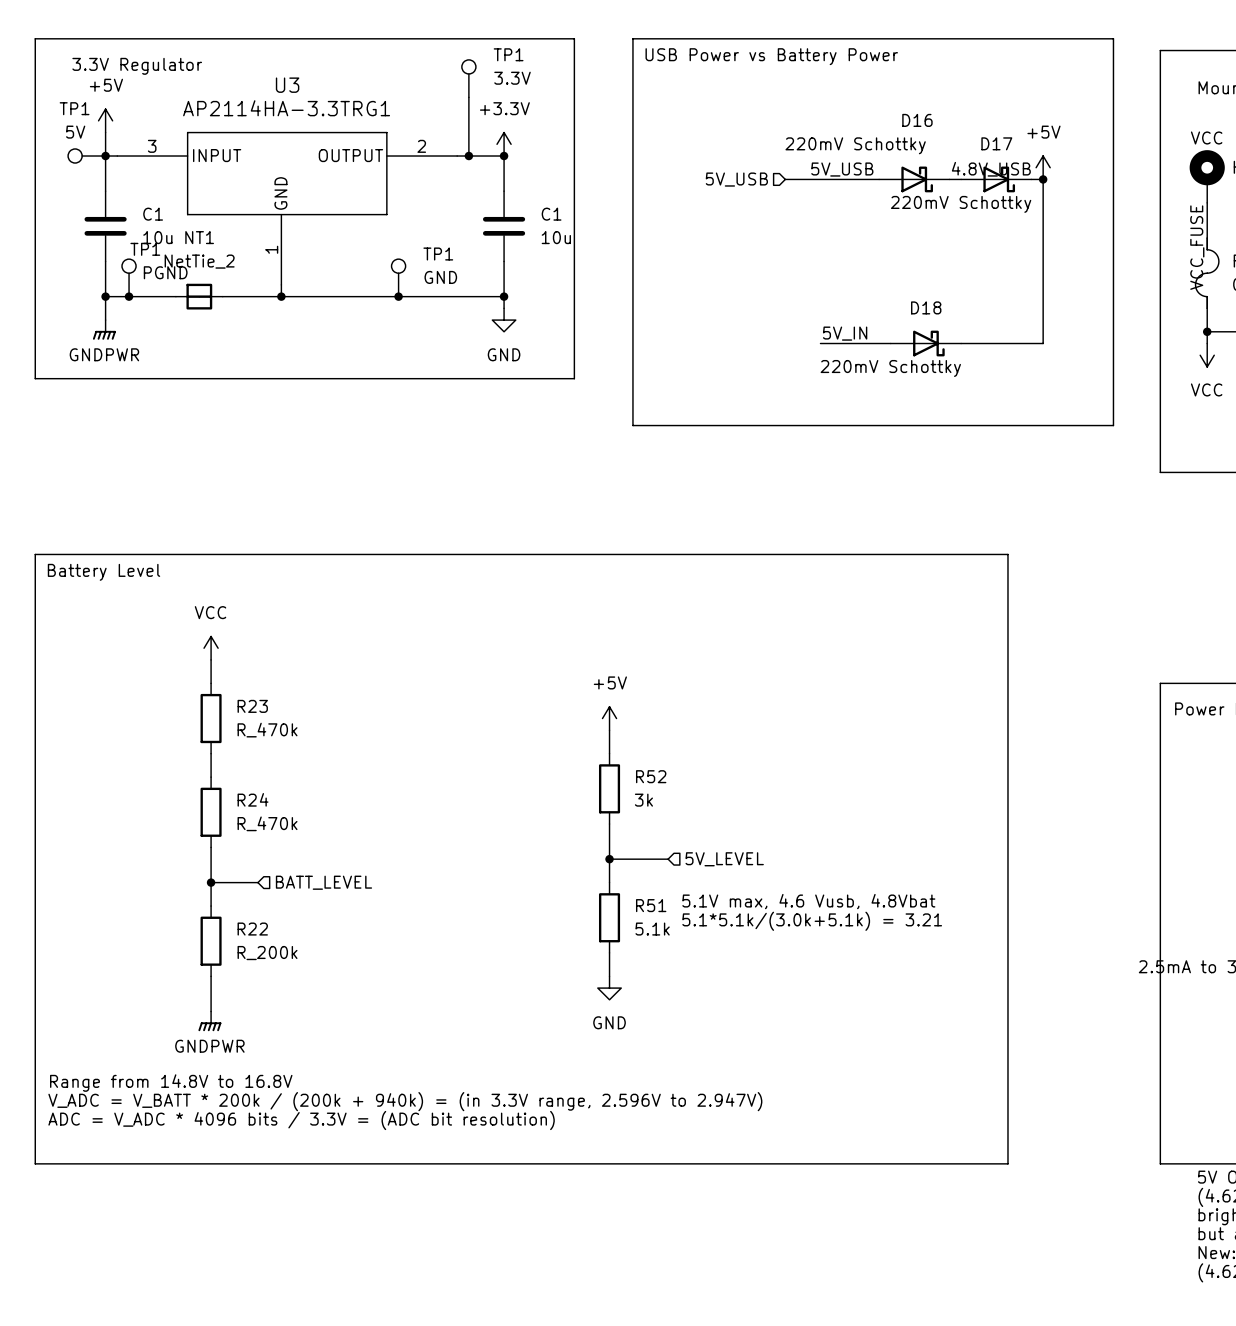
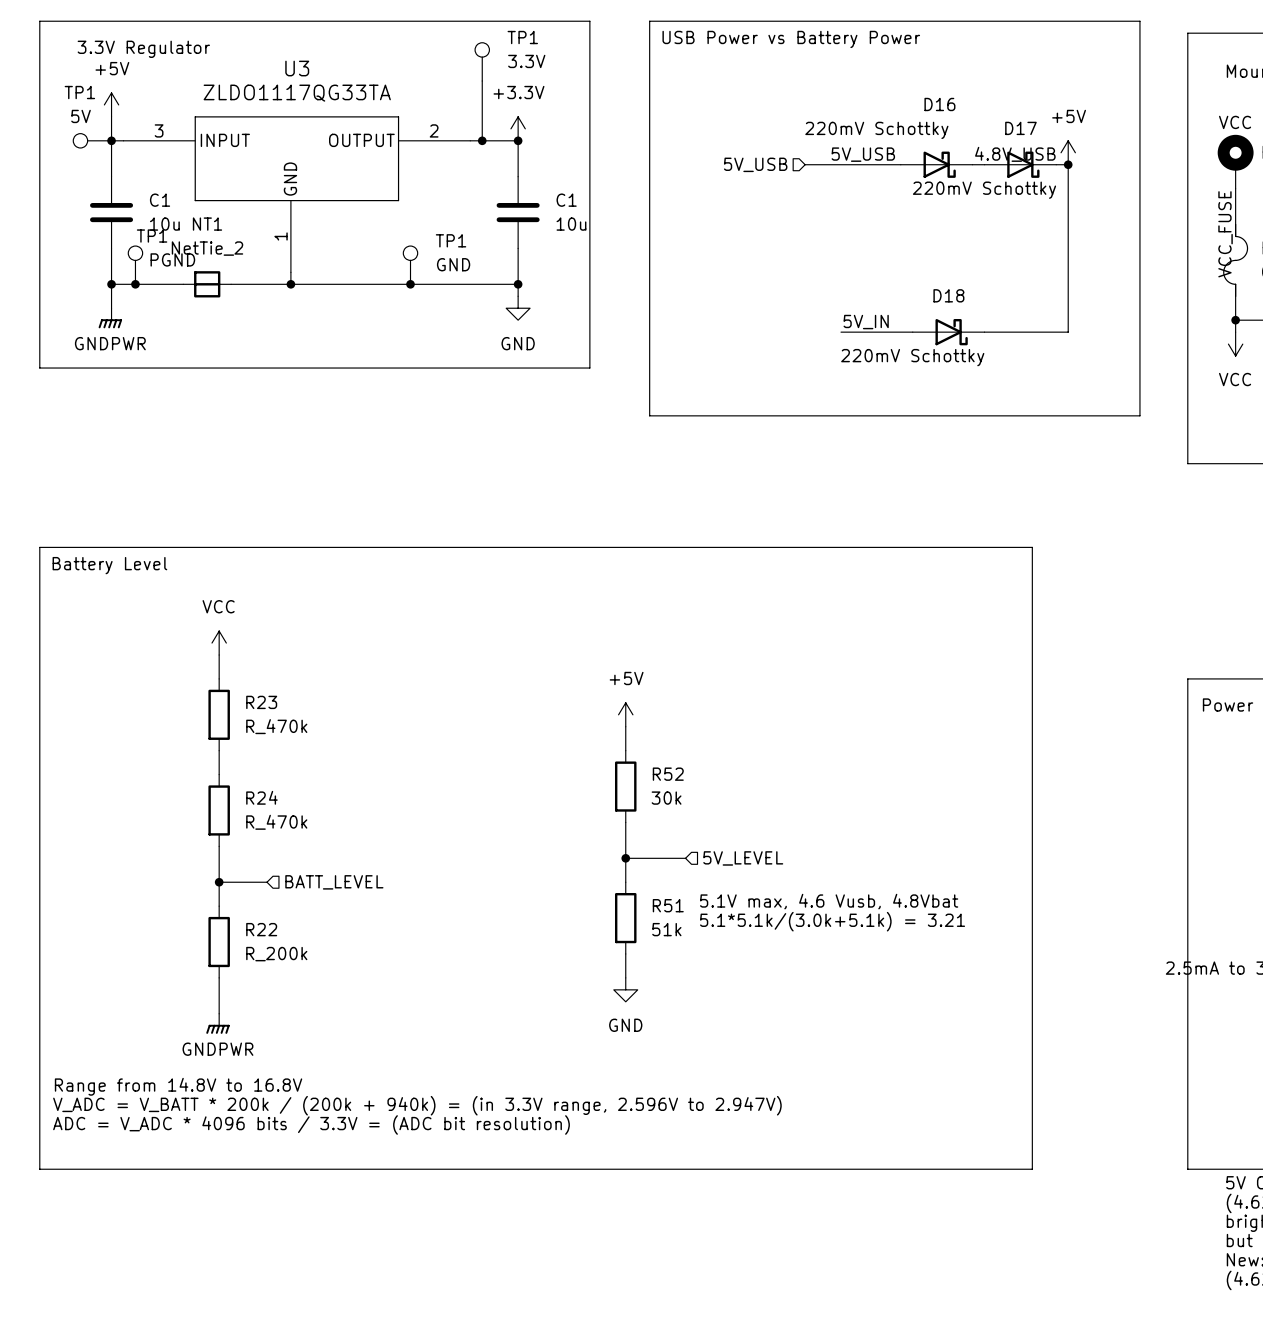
U3 value: AP2114HA-3.3TRG1 (286, 108) -> ZLDO1117QG33TA (297, 93)
R52 value: 3k (643, 800) -> 30k (666, 798)
R51 value: 5.1k (652, 929) -> 51k (666, 929)

